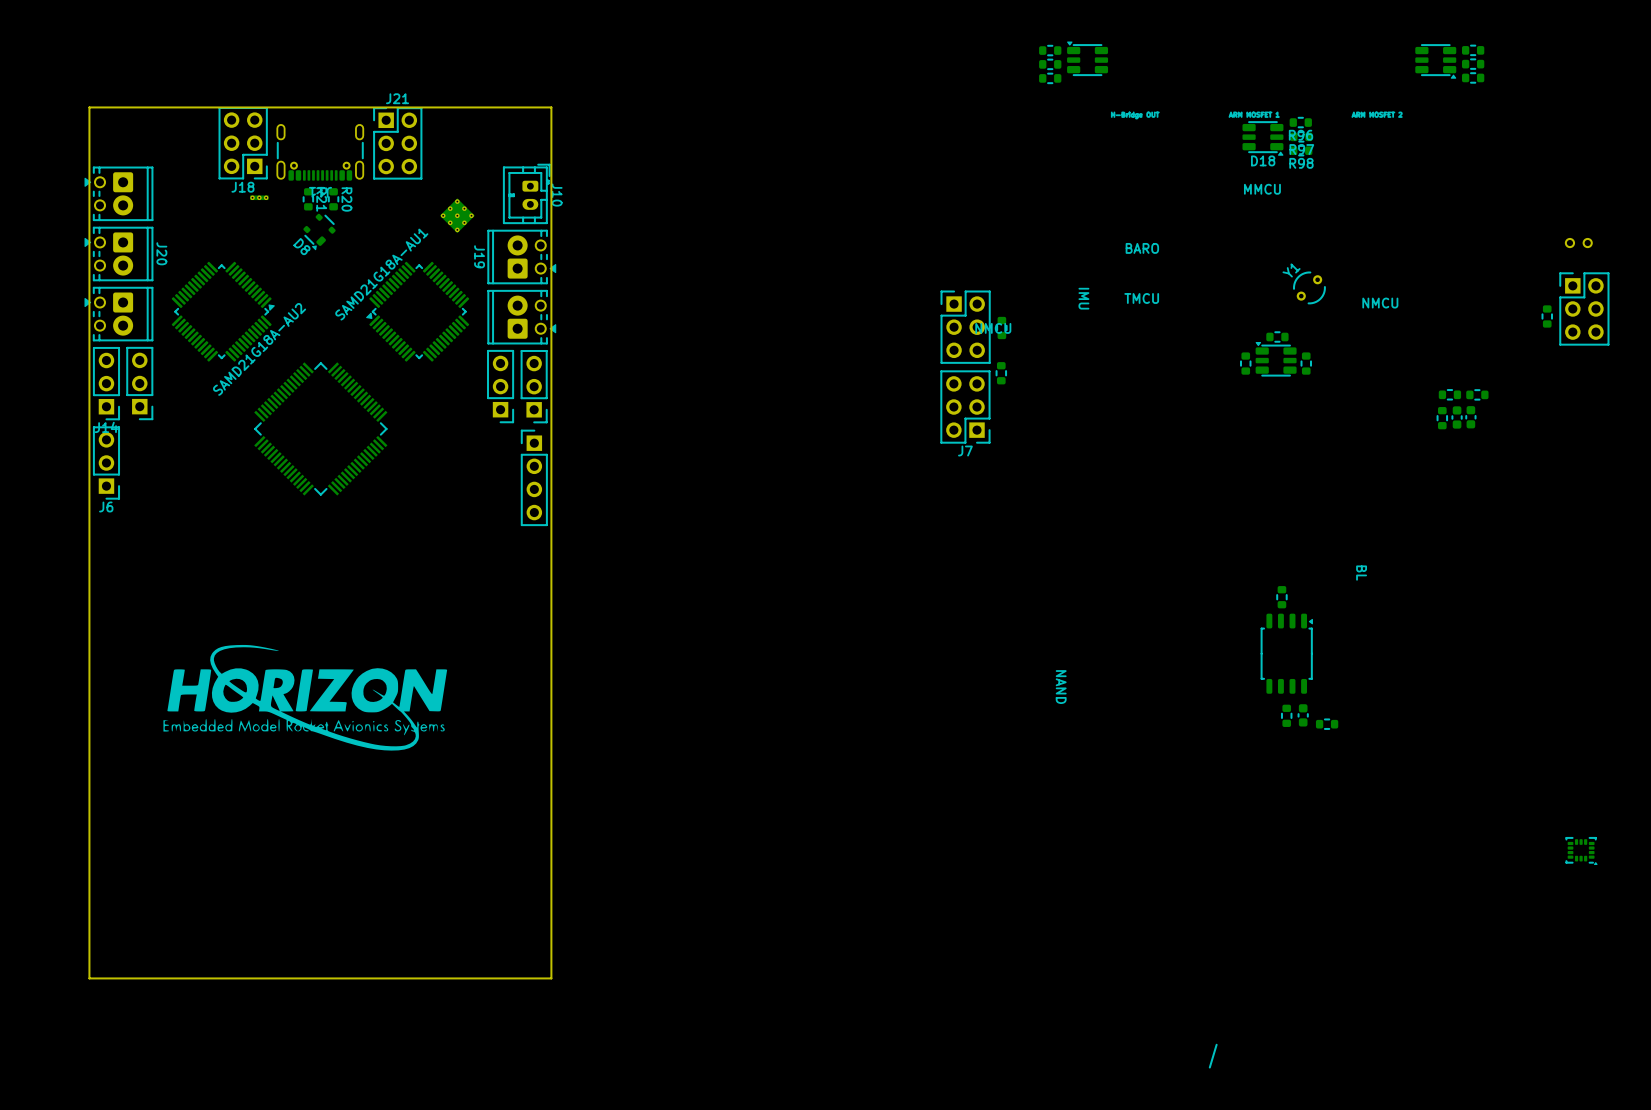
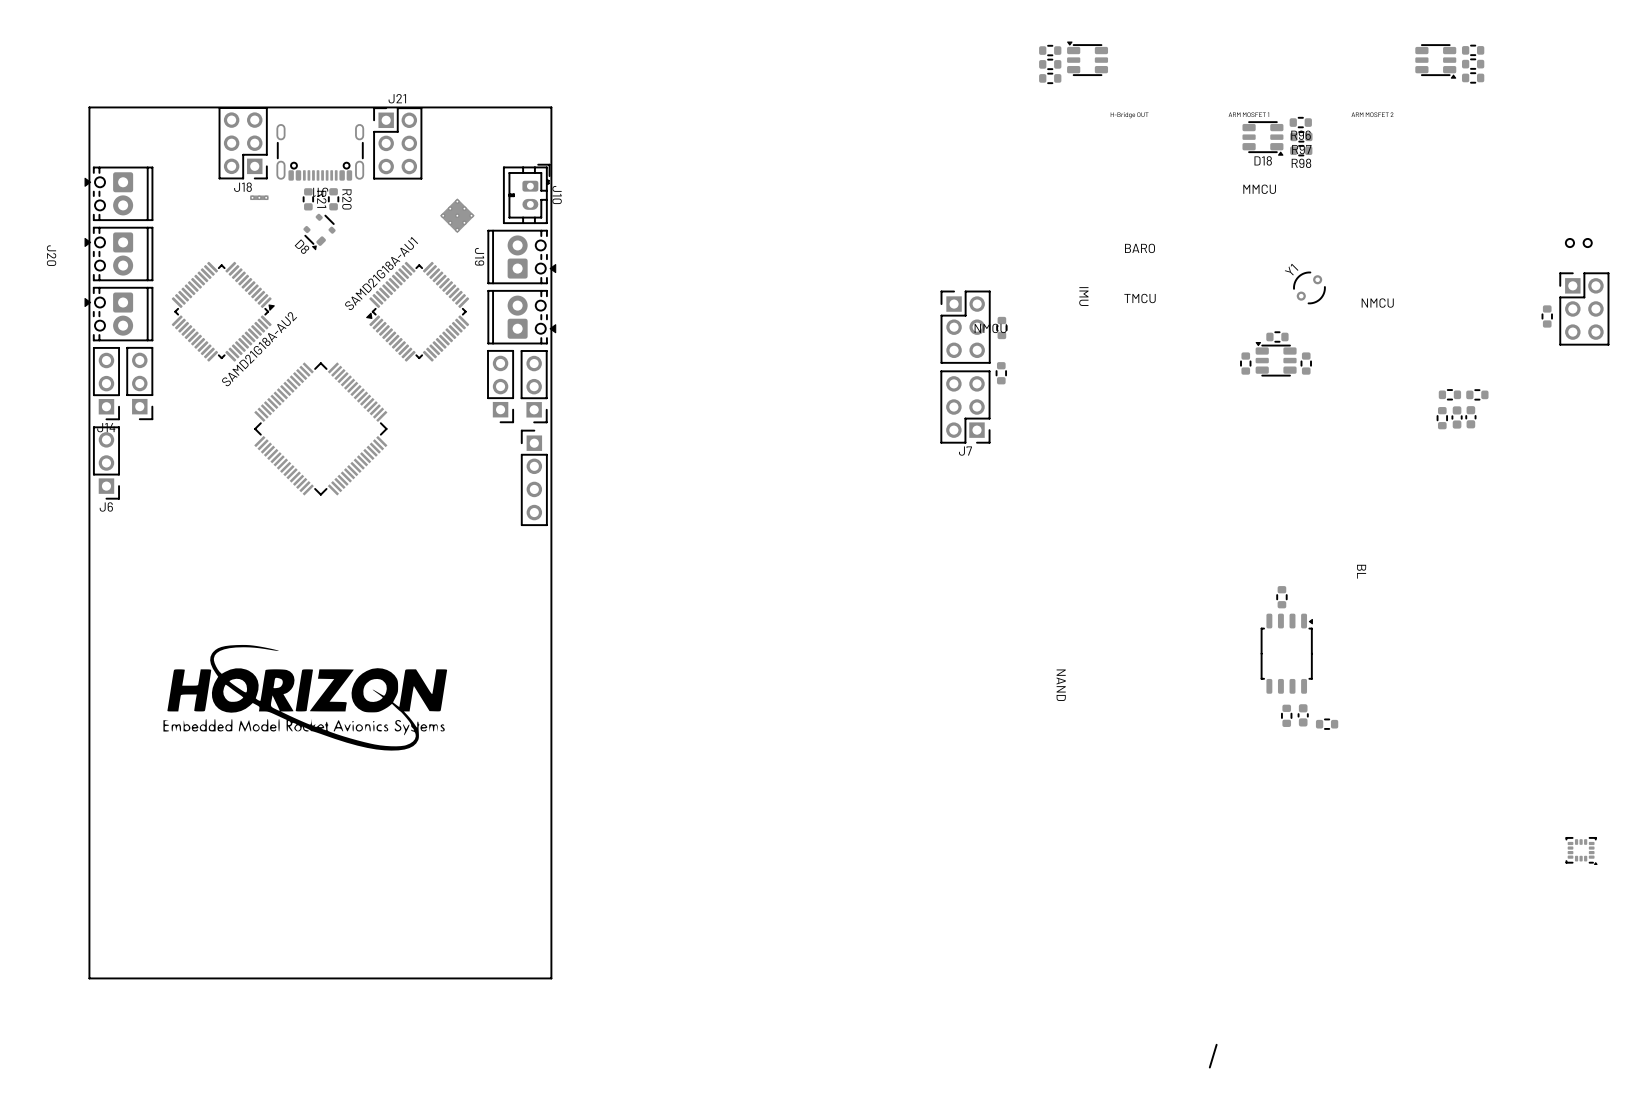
J20 name position: J20 (161, 253) -> J20 (51, 255)

